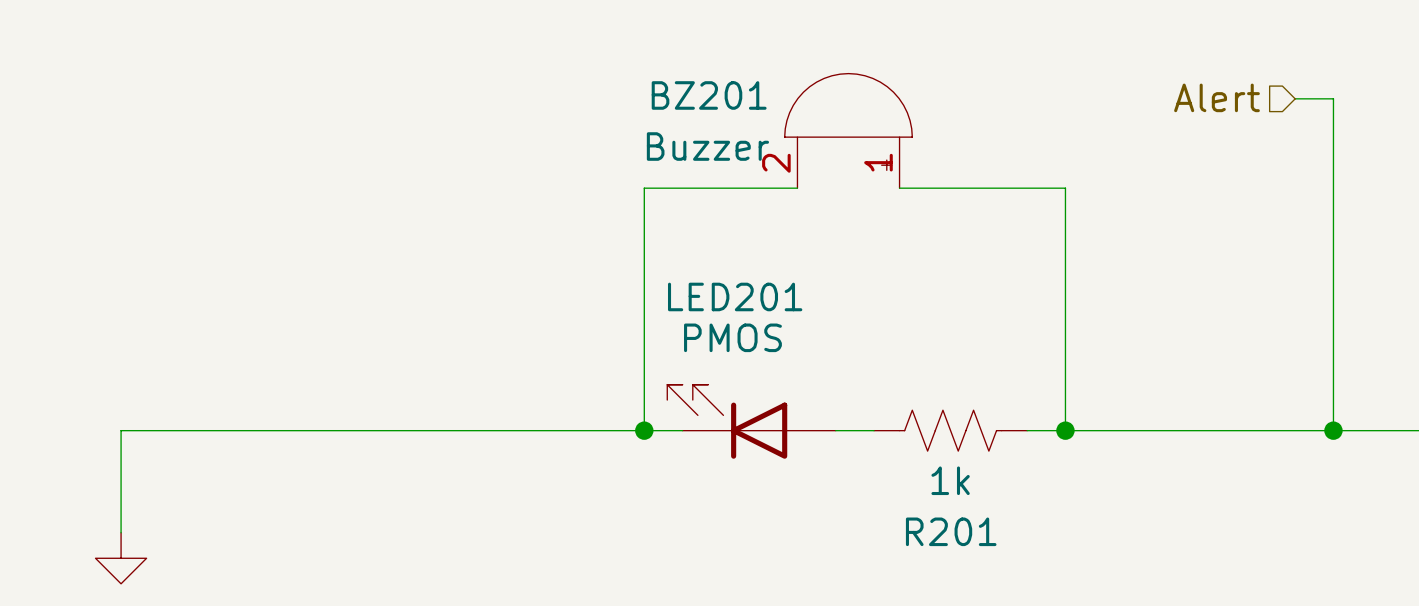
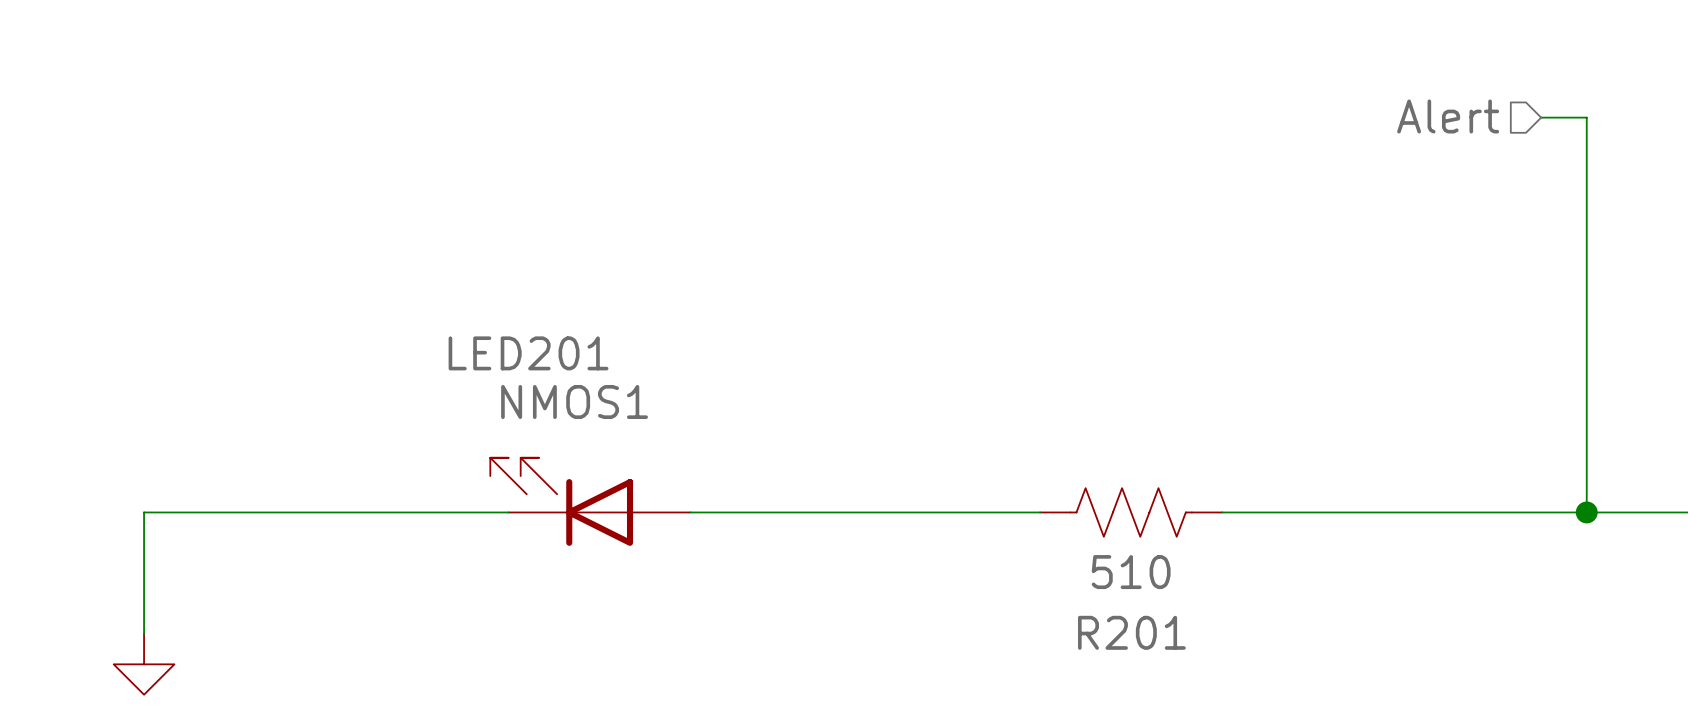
BZ201: Buzzer (848, 130) -> none
wire: (797, 188) (644, 188) (644, 430) -> none
wire: (899, 188) (1065, 188) (1065, 430) -> none
LED201 name position: LED201 (735, 296) -> LED201 (528, 353)
LED201 value: PMOS (732, 337) -> NMOS1 (574, 401)
LED201 position: (751, 421) -> (590, 501)
junction: (644, 430) -> none
junction: (1065, 430) -> none
R201 value: 1k (950, 480) -> 510 (1131, 572)

